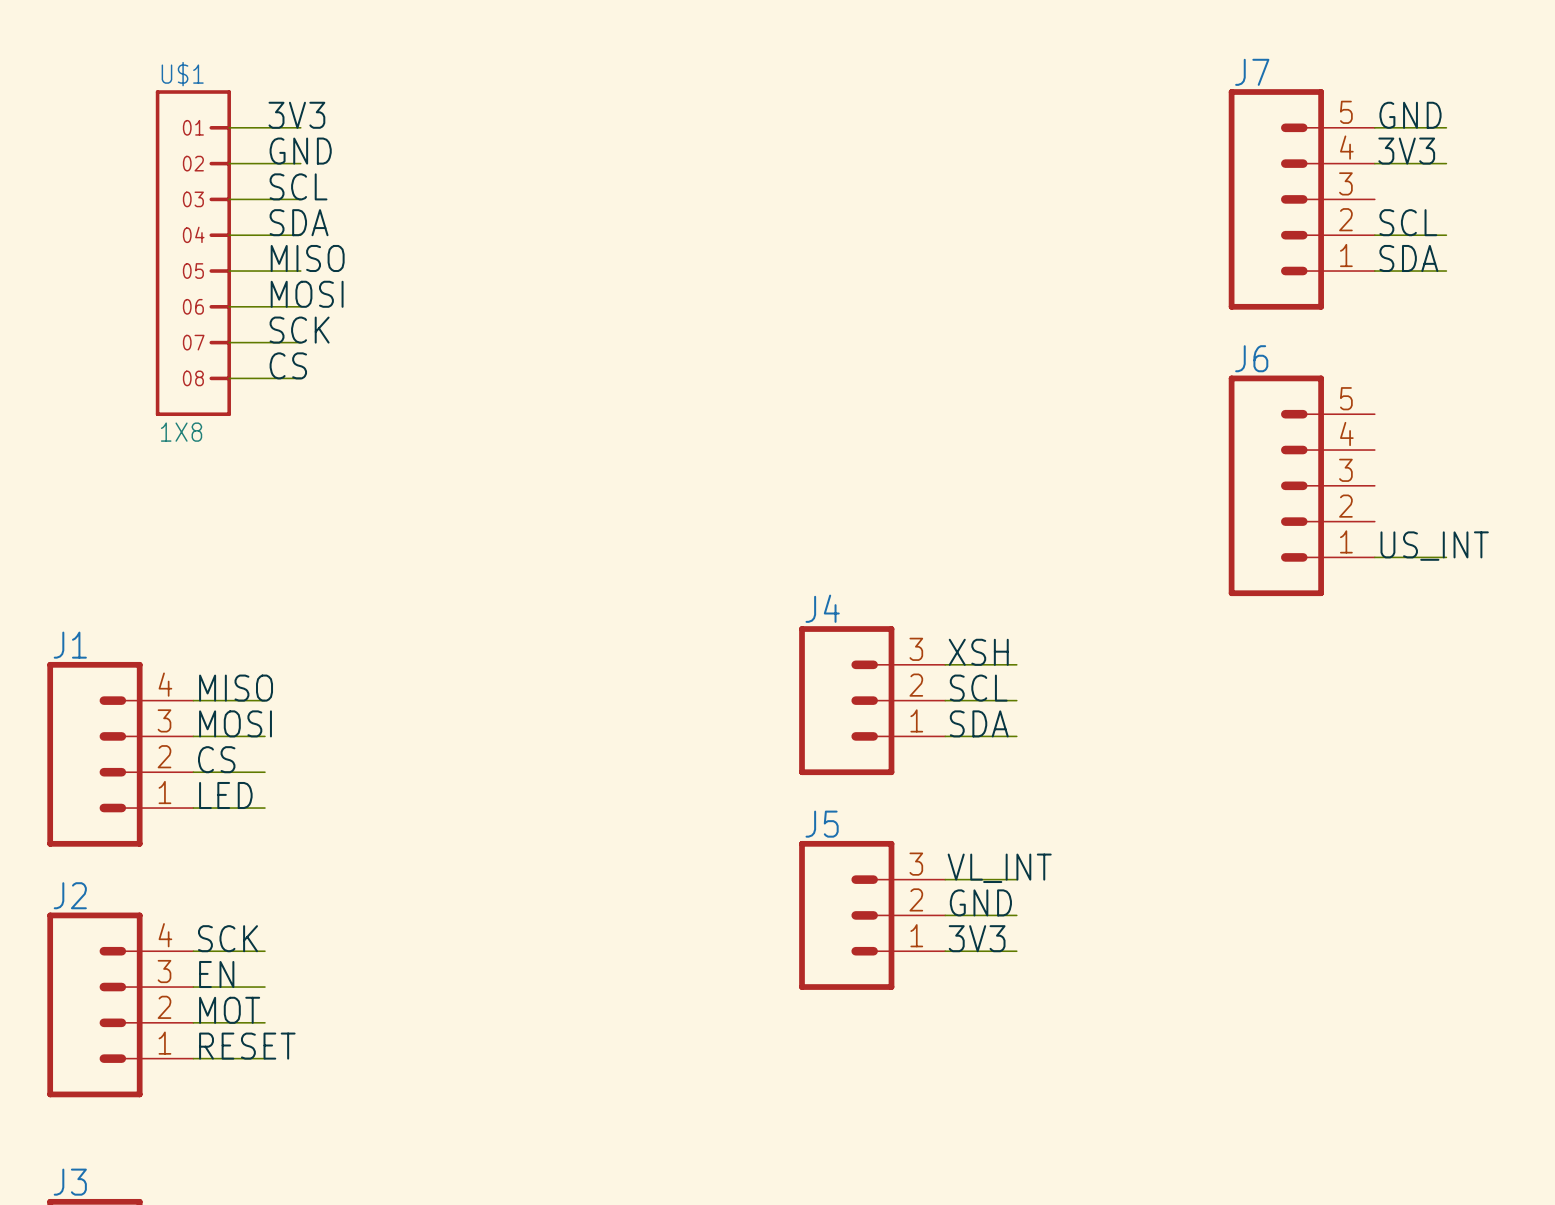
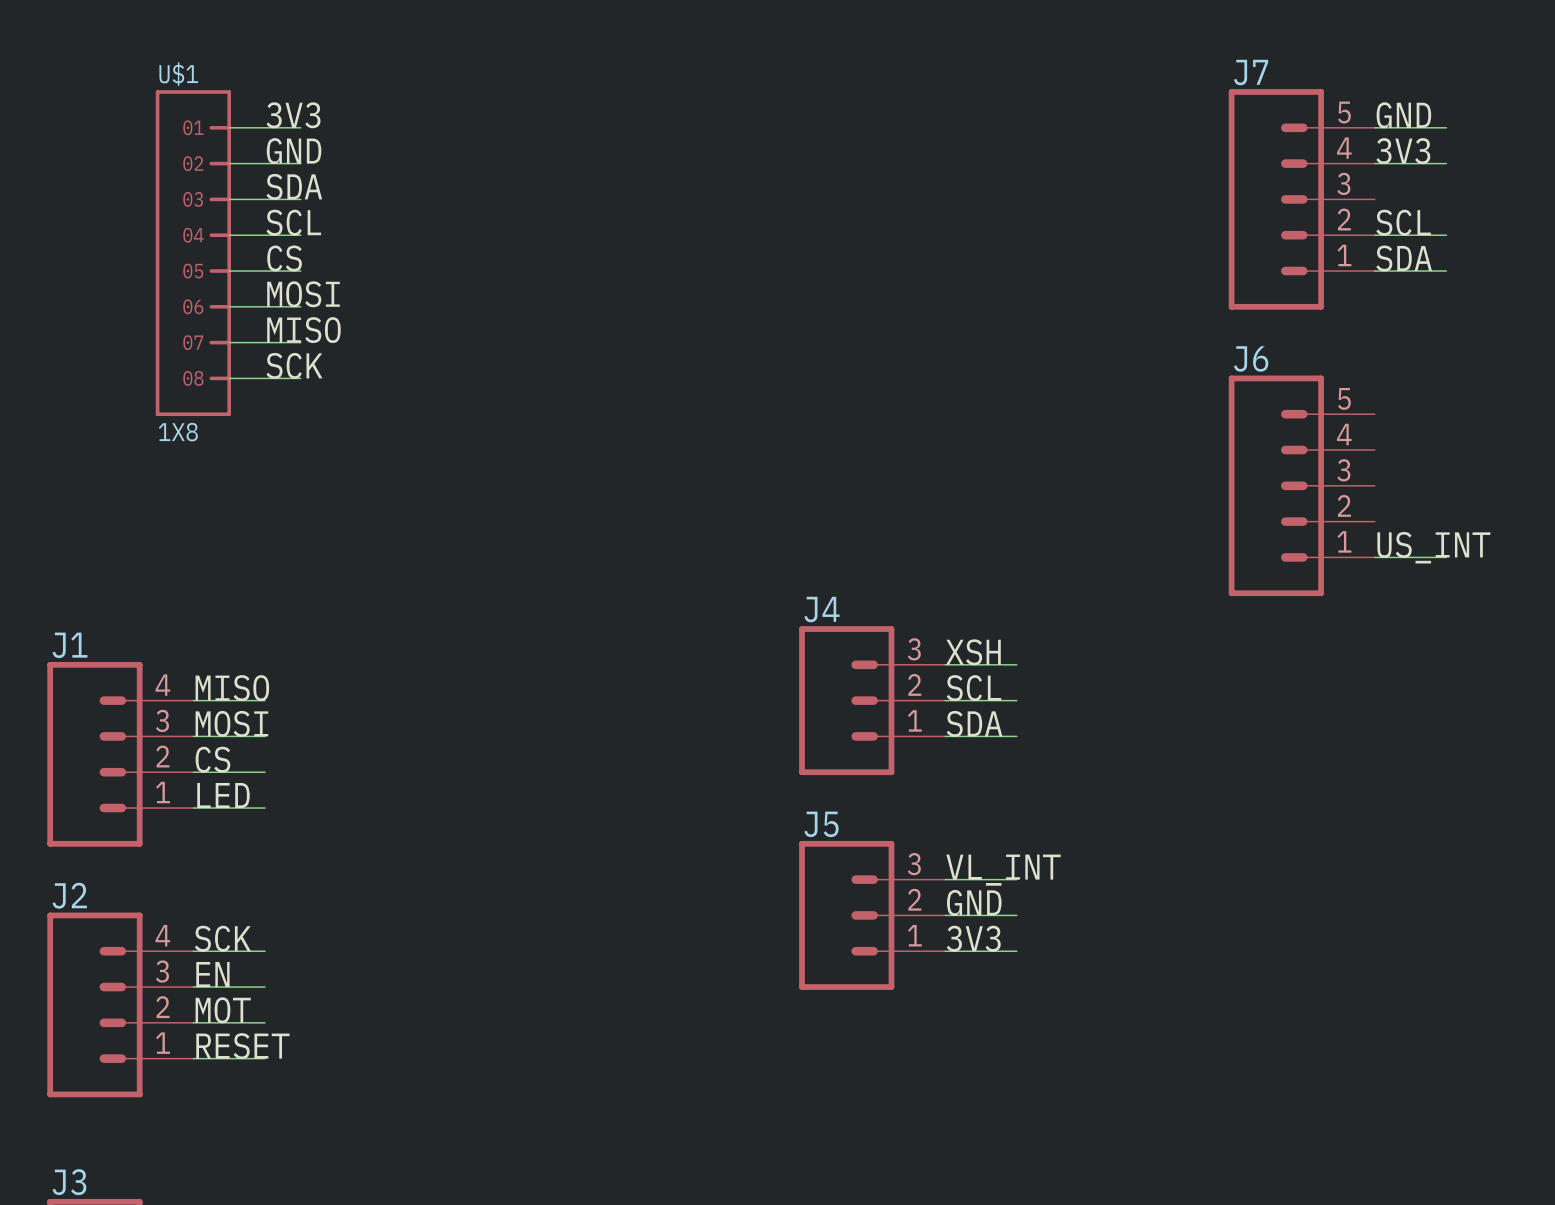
label: SCL (298, 186) -> SDA (294, 186)
label: SDA (299, 222) -> SCL (293, 222)
label: MISO (307, 258) -> CS (284, 258)
label: SCK (299, 330) -> MISO (303, 330)
label: CS (288, 365) -> SCK (294, 365)

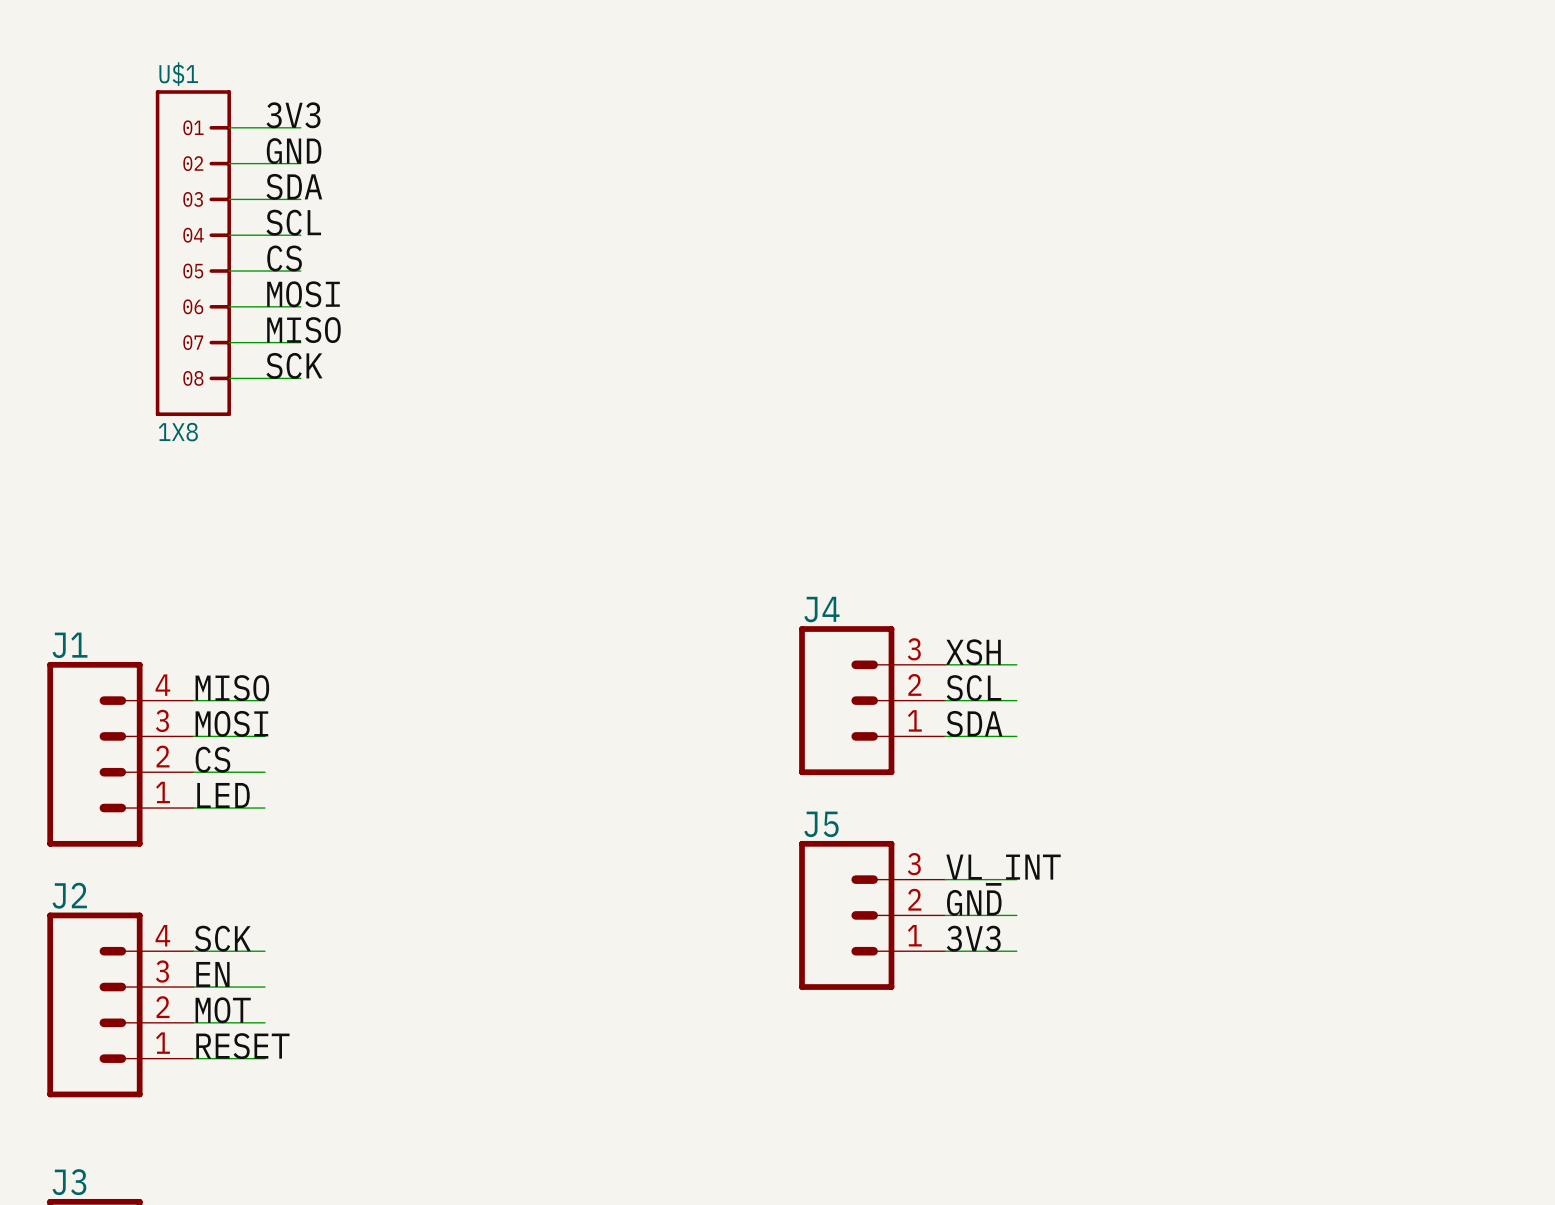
label: GND (1403, 115) -> none
wire: (1374, 127) (1446, 127) -> none
label: 3V3 (1403, 151) -> none
wire: (1374, 163) (1446, 163) -> none
J7: (1301, 199) -> none
label: SCL (1403, 222) -> none
wire: (1374, 235) (1446, 235) -> none
label: SDA (1404, 258) -> none
wire: (1374, 271) (1446, 271) -> none
J6: (1301, 485) -> none
label: US_INT (1433, 547) -> none
wire: (1374, 557) (1446, 557) -> none

